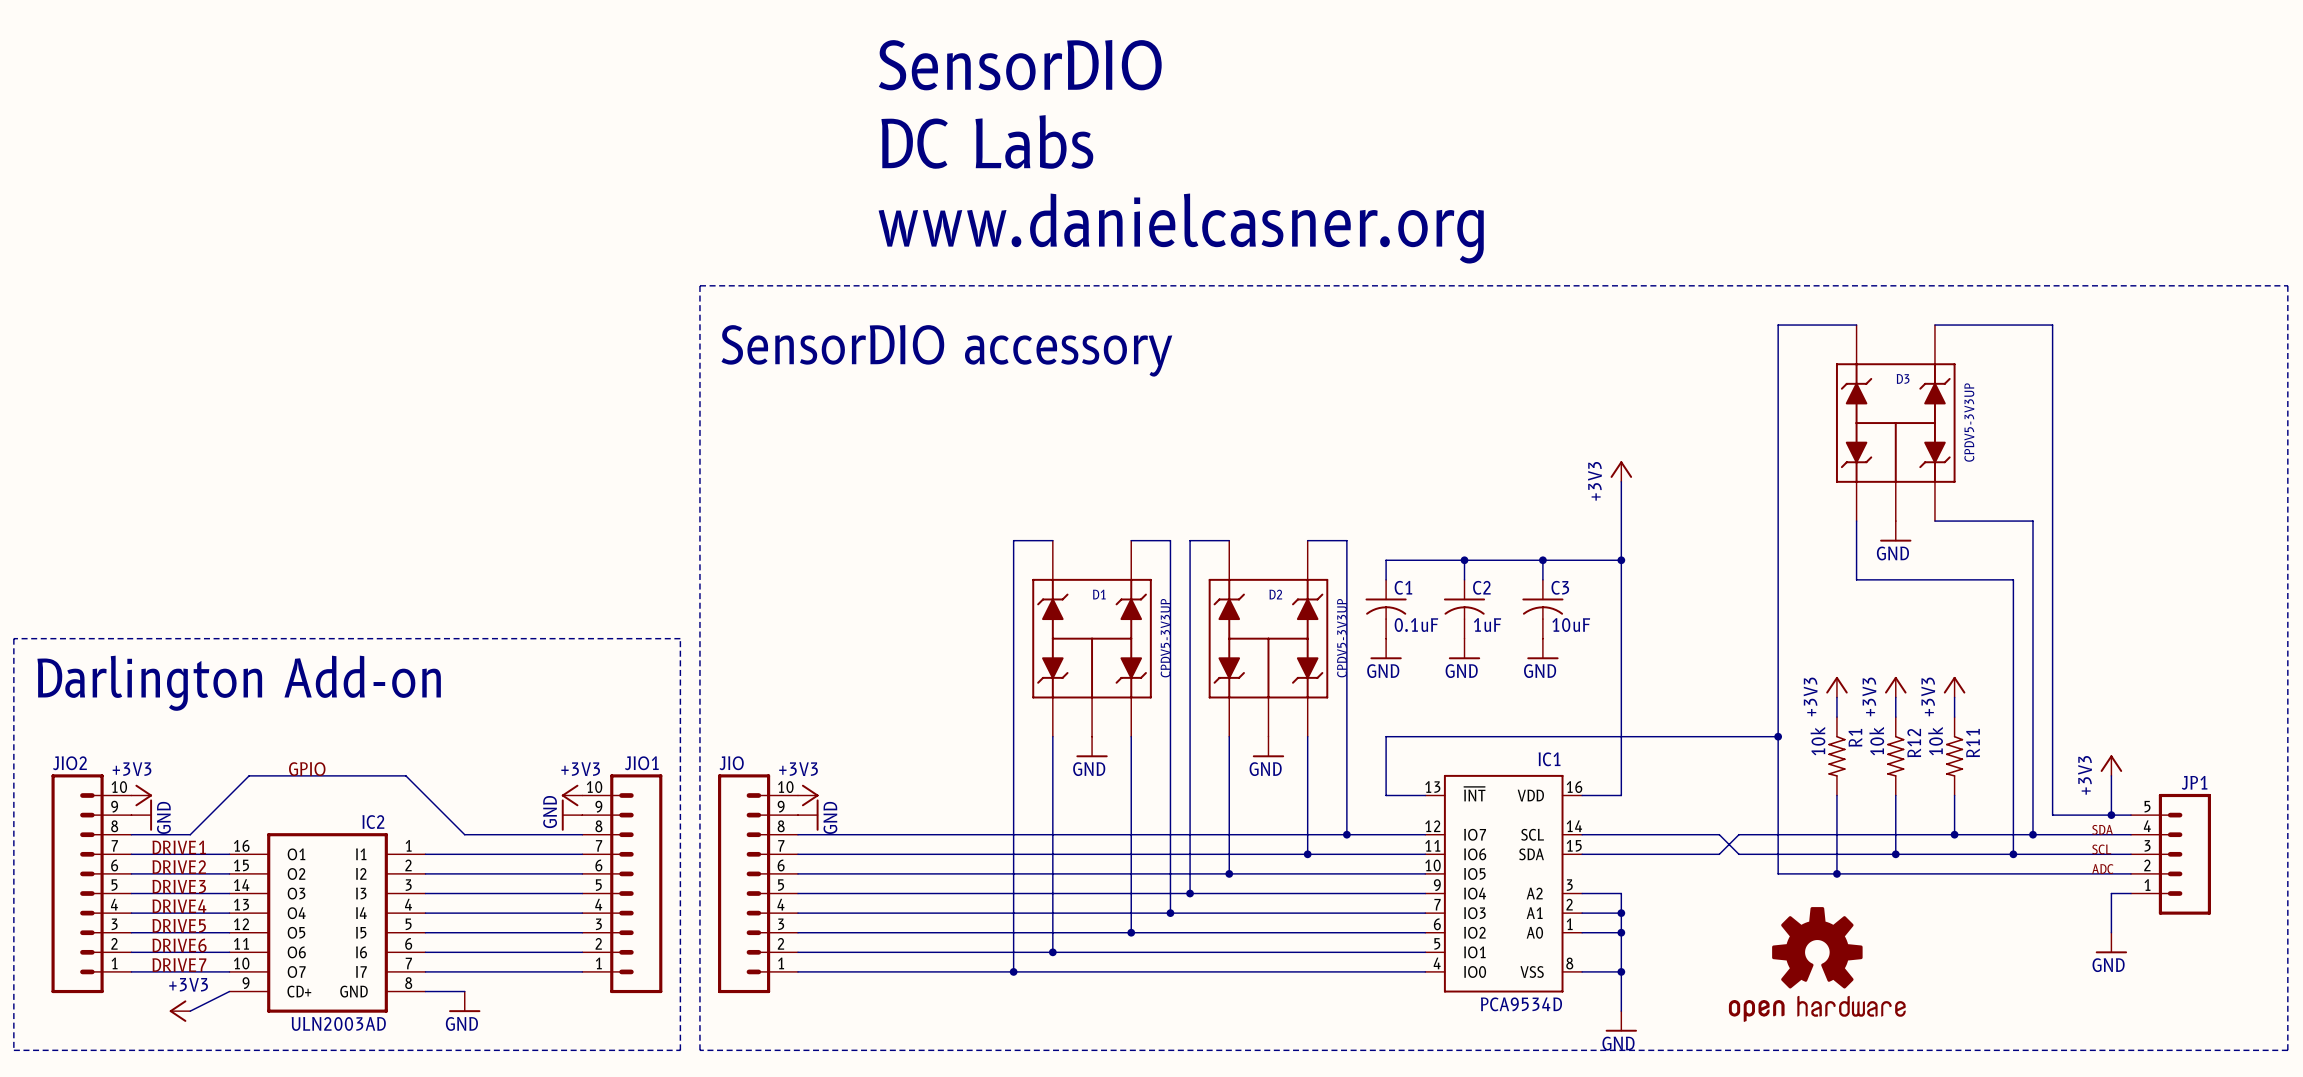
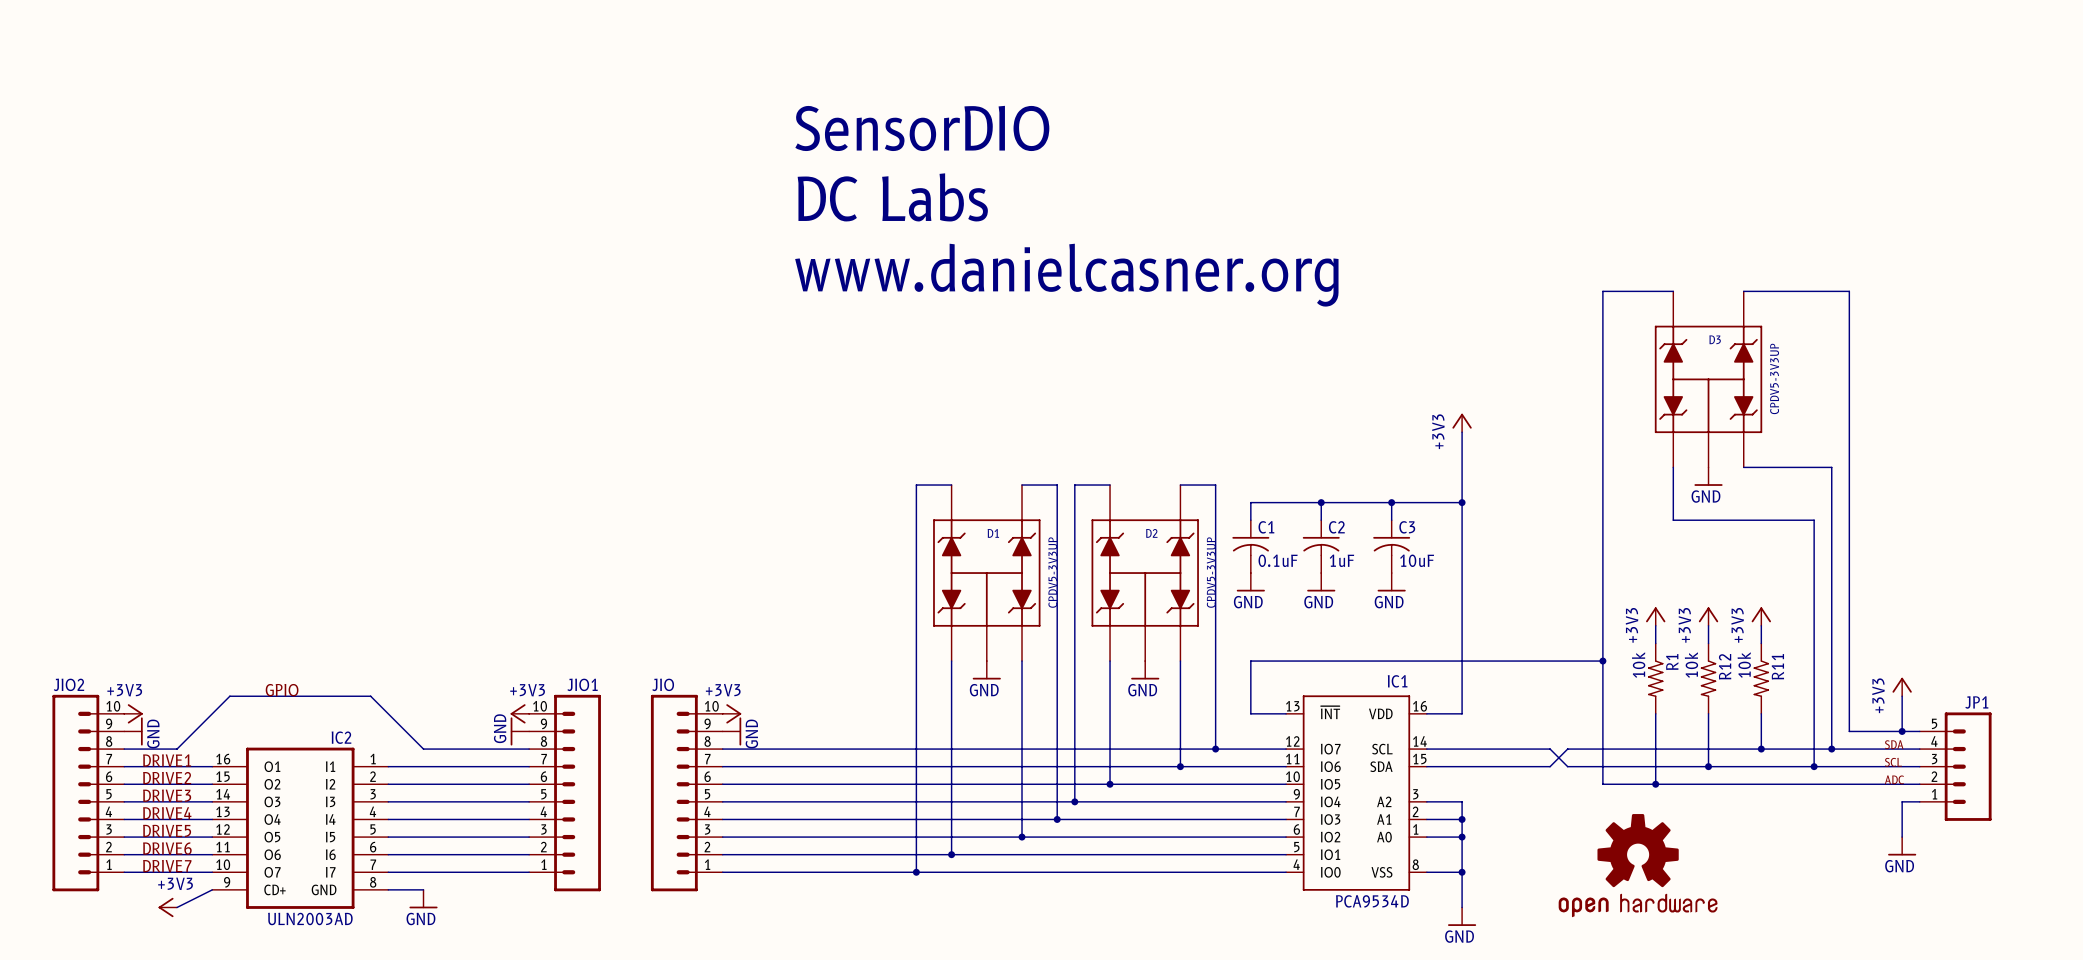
text: SensorDIO (1020, 65) -> none
text: DC Labs (987, 141) -> SensorDIO (922, 128)
text: www.danielcasner.org (1181, 228) -> DC Labs (892, 197)
line: (699, 285) (699, 1050) (2287, 1050) (2287, 285) (699, 285) -> none
text: none -> www.danielcasner.org (1066, 275)
text: SensorDIO accessory (946, 350) -> none
line: (13, 638) (680, 638) (680, 1050) (13, 1050) (13, 638) -> none
text: Darlington Add-on (239, 683) -> none

